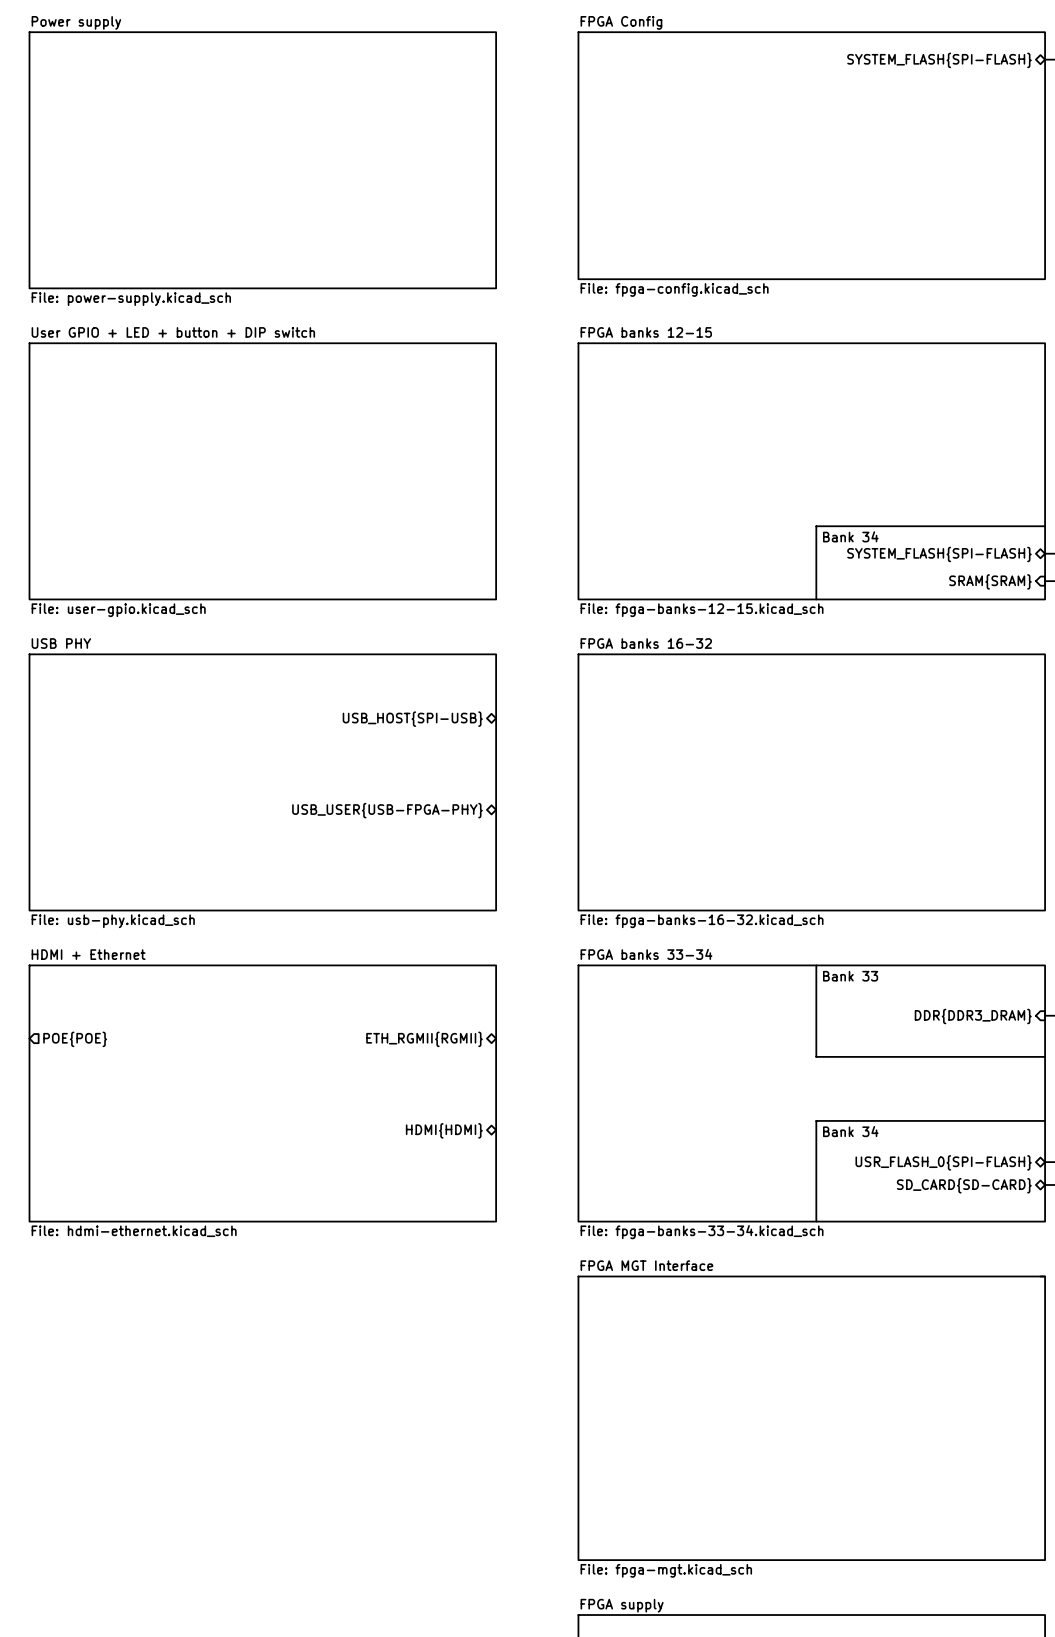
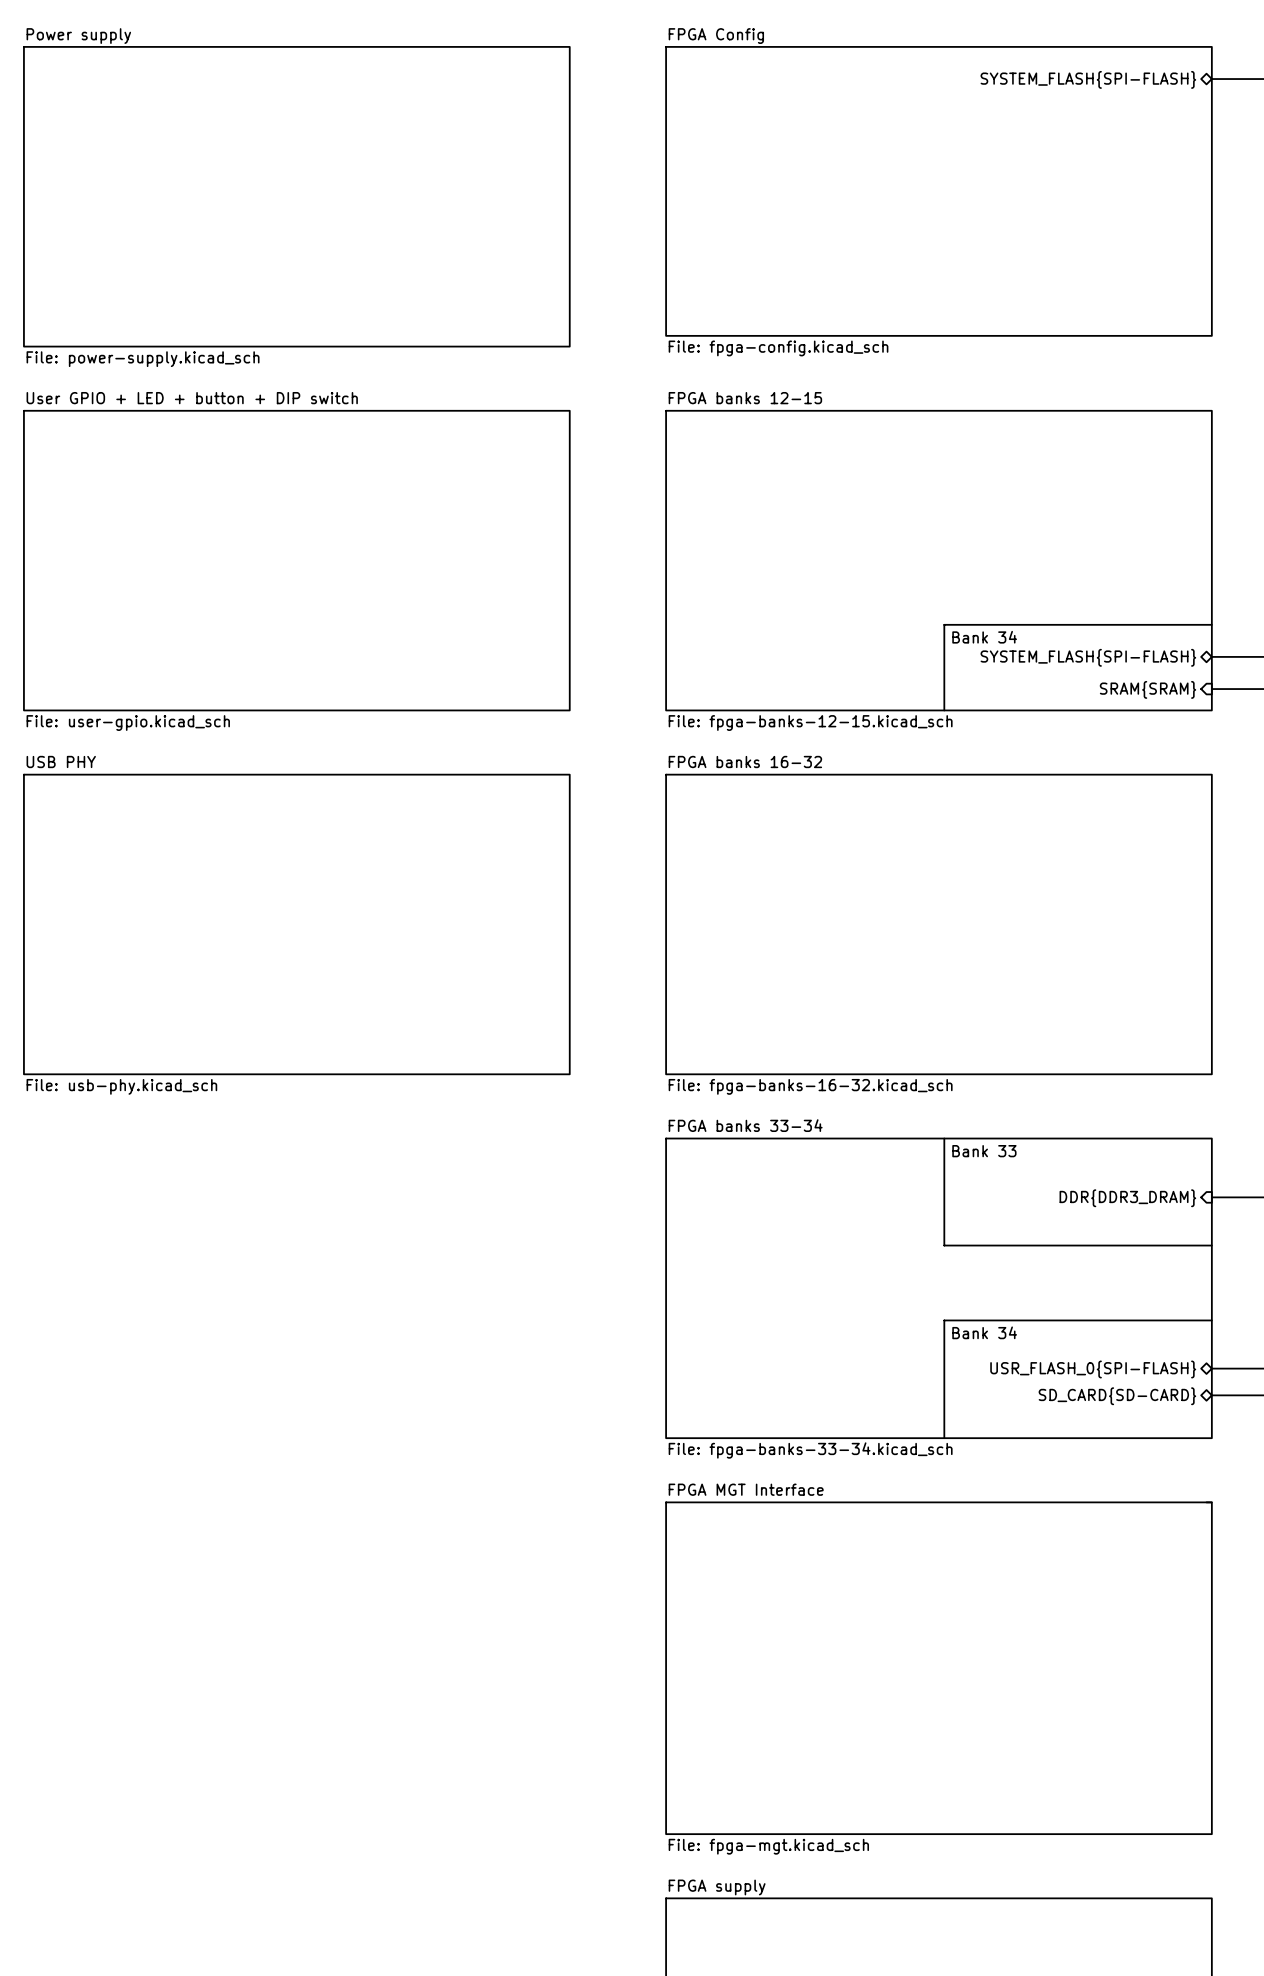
sheet pin: USB_HOST{SPI-USB} (412, 719) -> none
sheet pin: USB_USER{USB-FPGA-PHY} (387, 810) -> none
sheet pin: POE{POE} (75, 1039) -> none
sheet pin: ETH_RGMII{RGMII} (424, 1039) -> none
sheet HDMI + Ethernet: File: hdmi-ethernet.kicad_sch (262, 1093) -> none
sheet pin: HDMI{HDMI} (444, 1130) -> none

